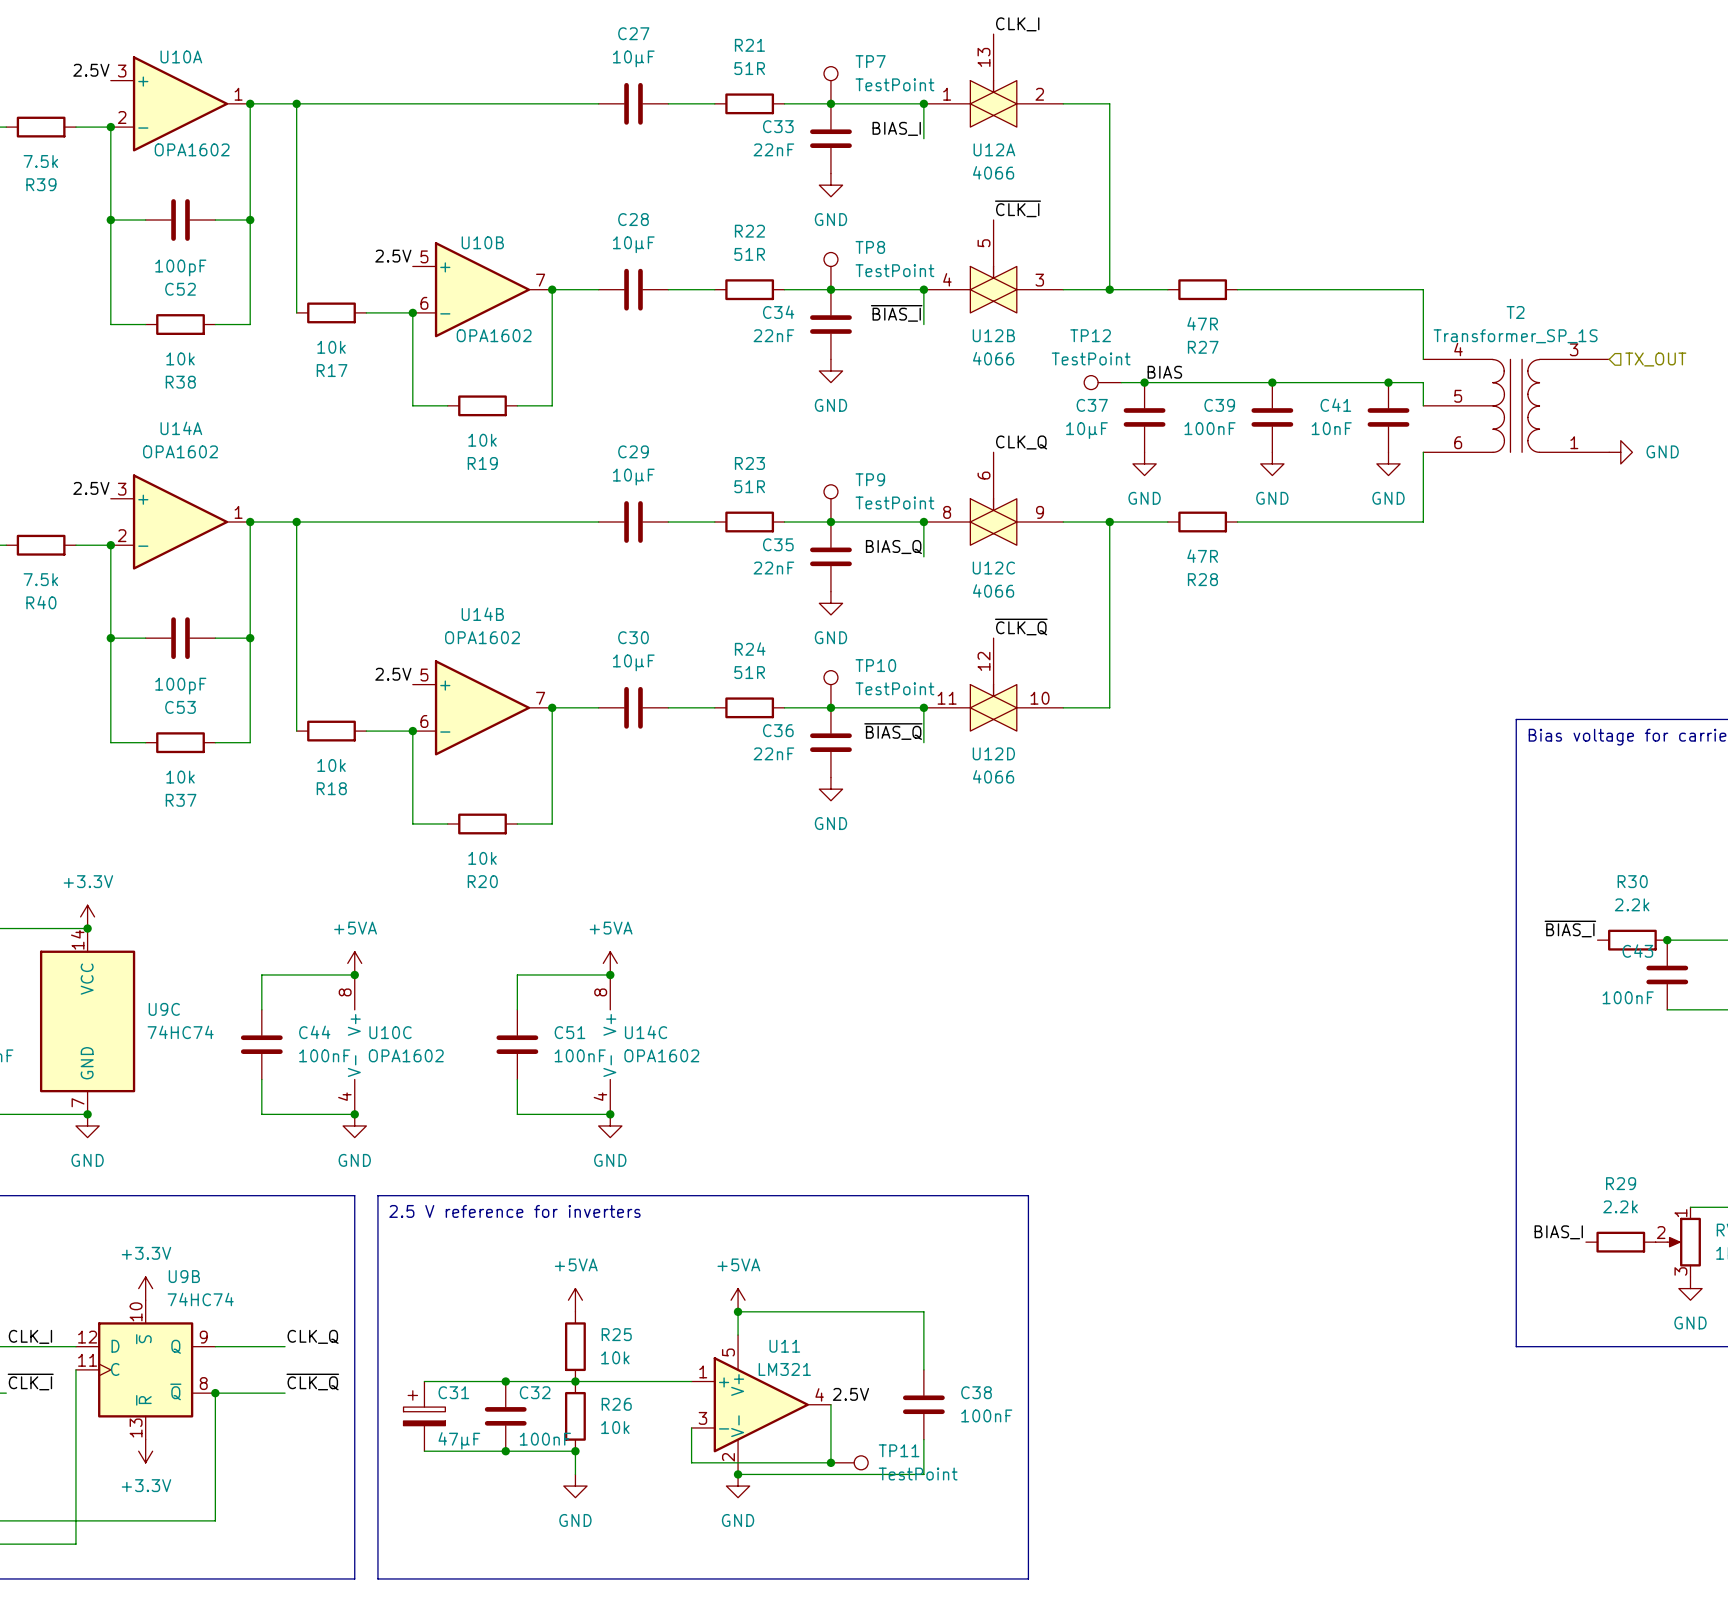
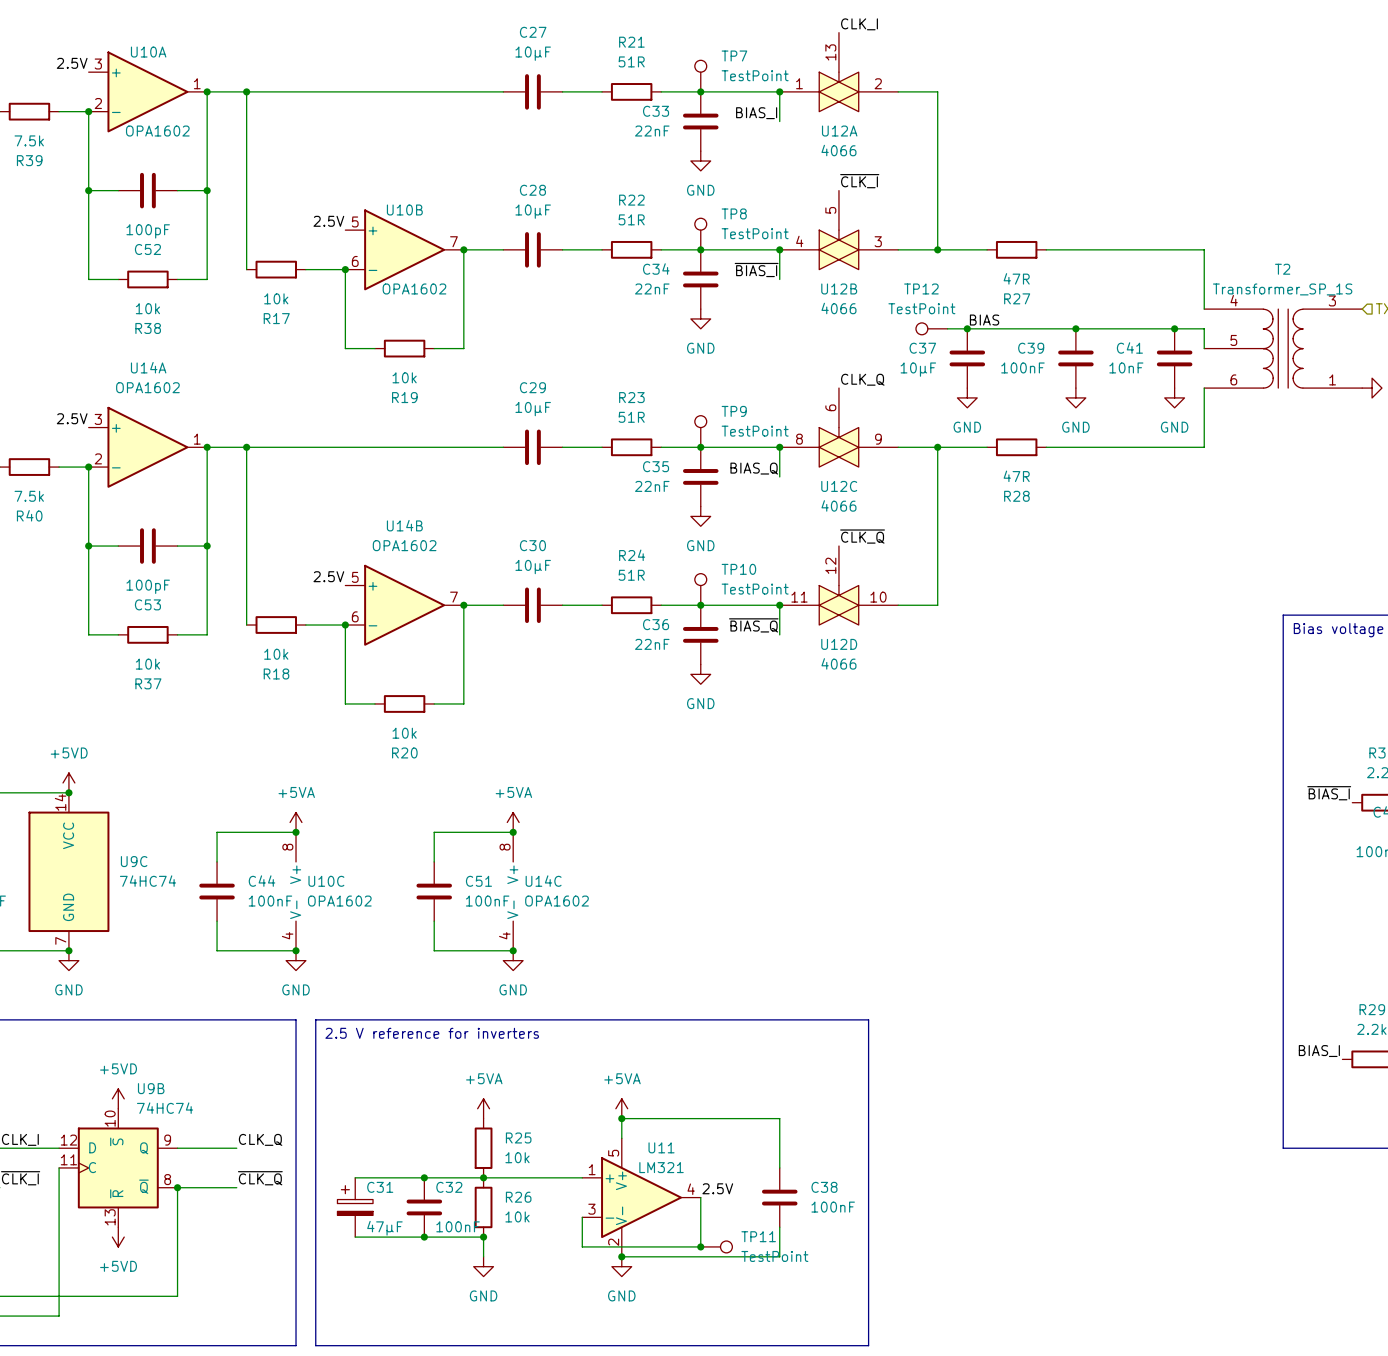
power symbol: +3.3V (87, 916) -> +5VD (68, 782)
power symbol: +3.3V (145, 1288) -> +5VD (118, 1098)
power symbol: +3.3V (145, 1451) -> +5VD (118, 1237)

